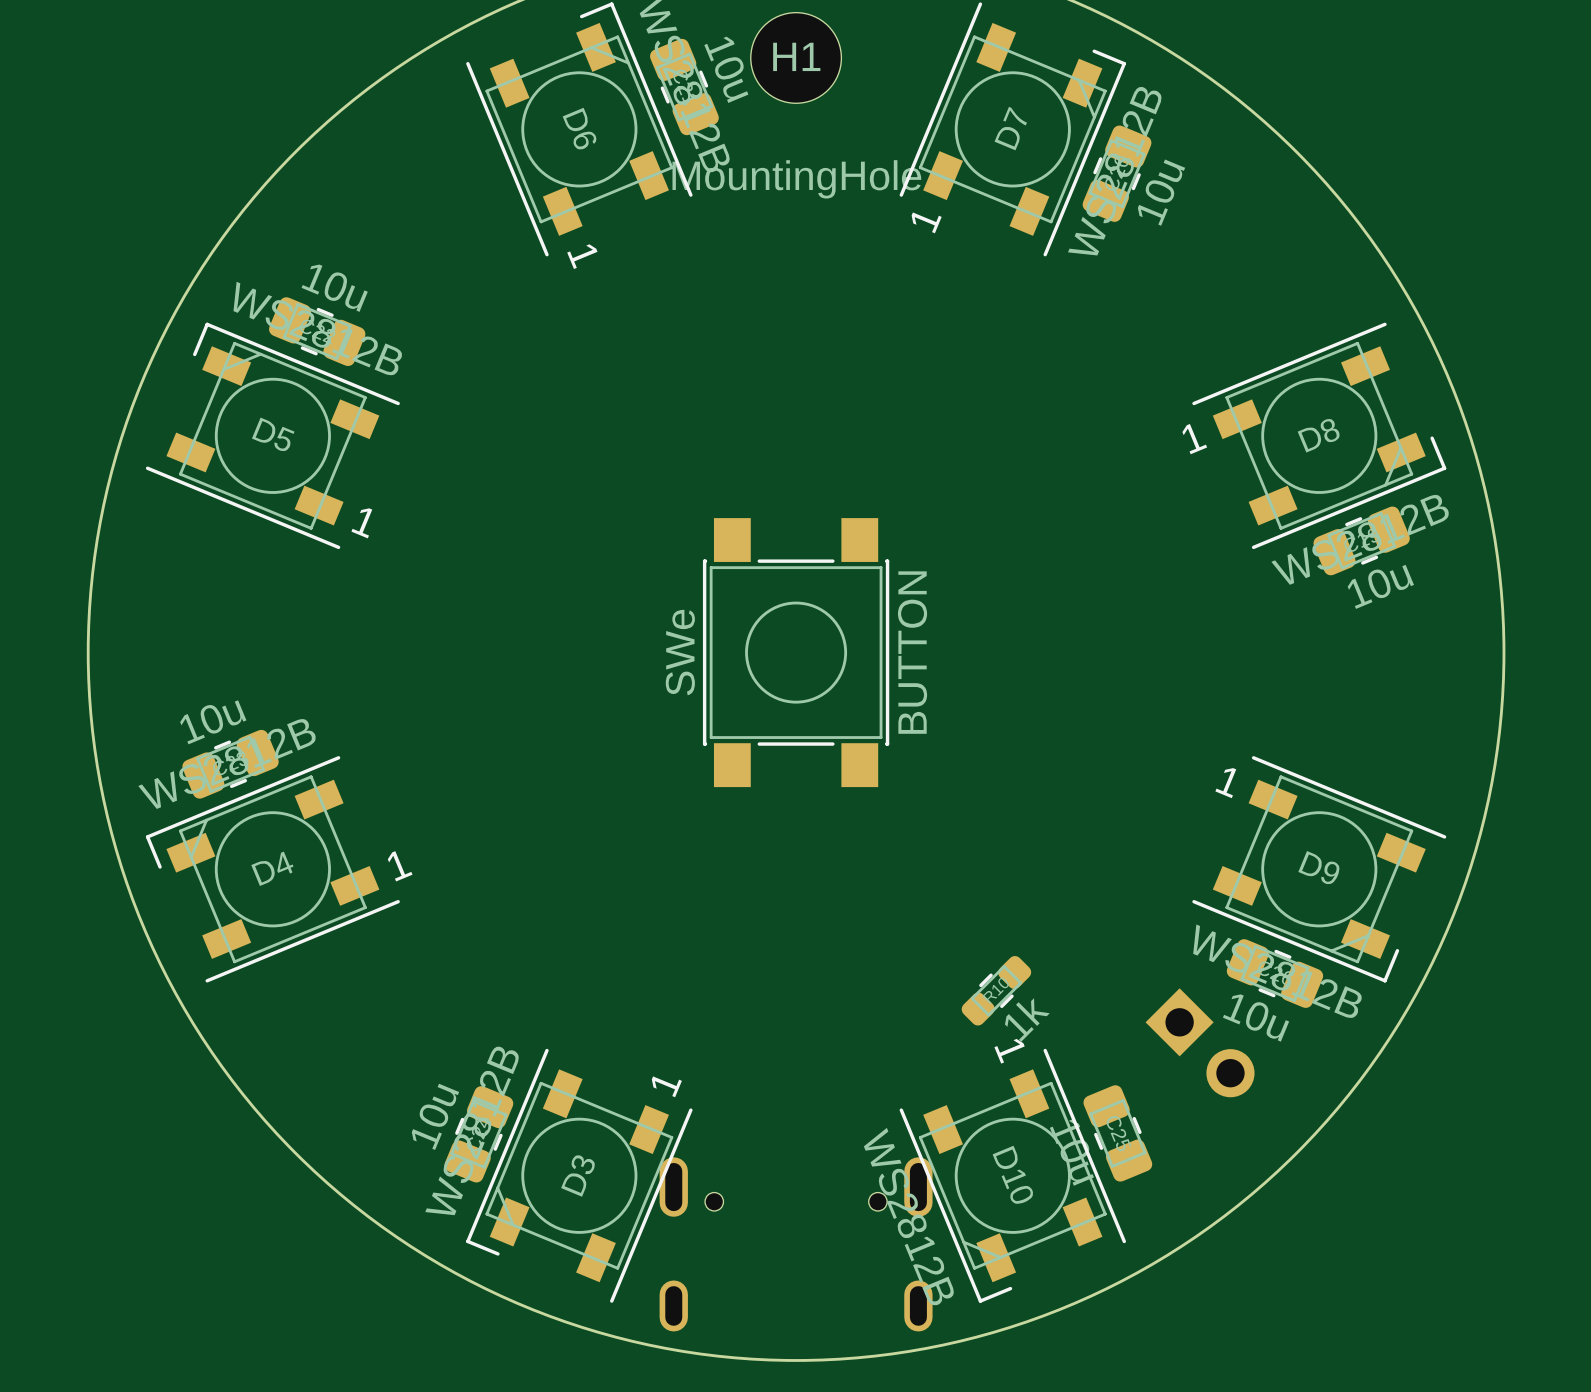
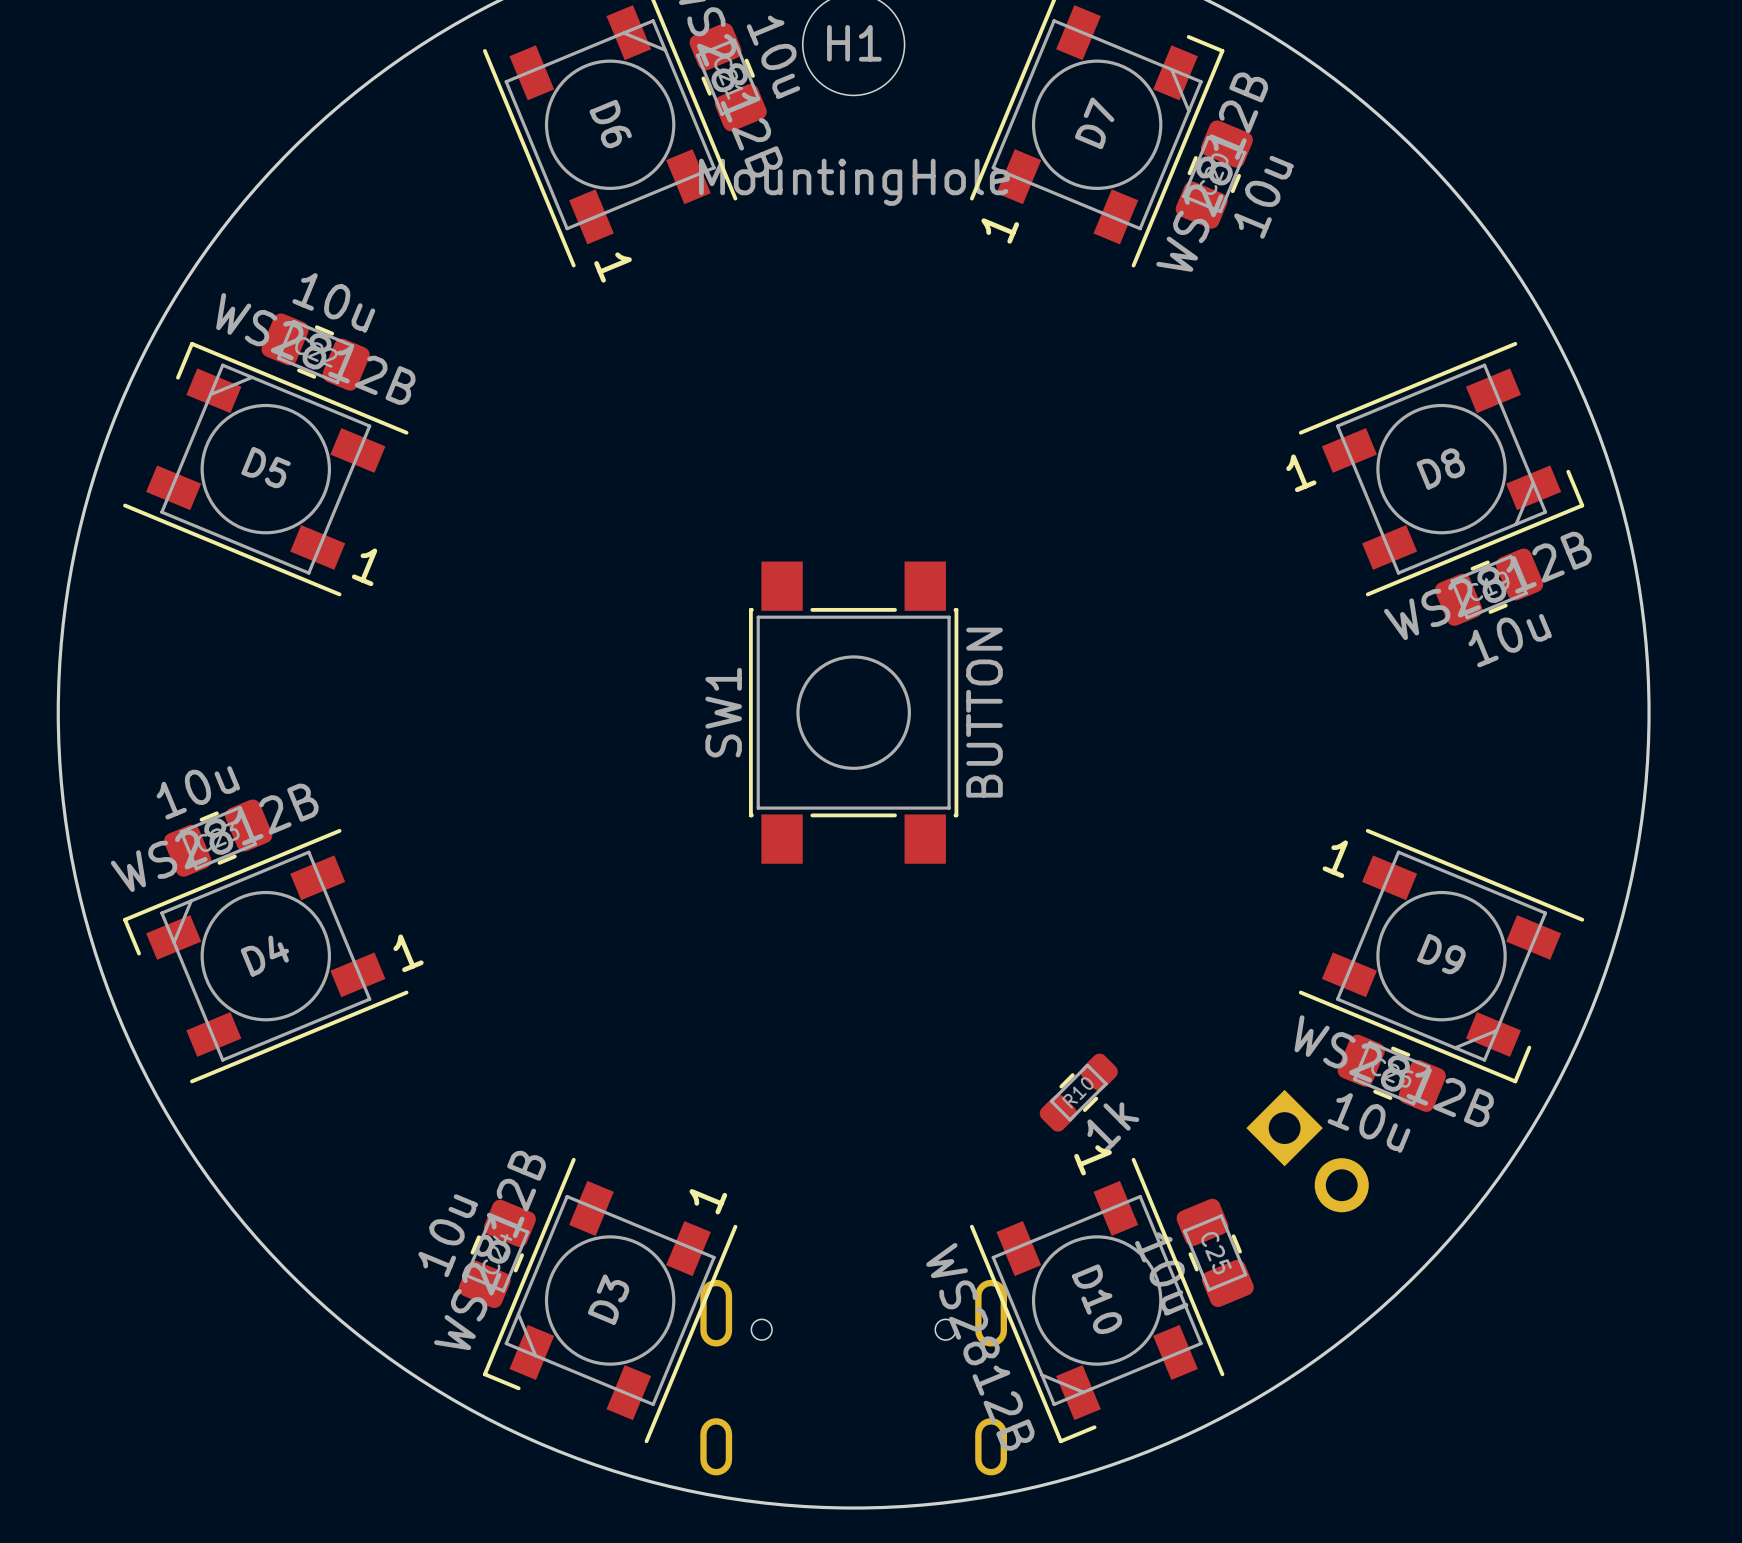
SWe name: SWe (680, 652) -> SW1 (723, 712)

